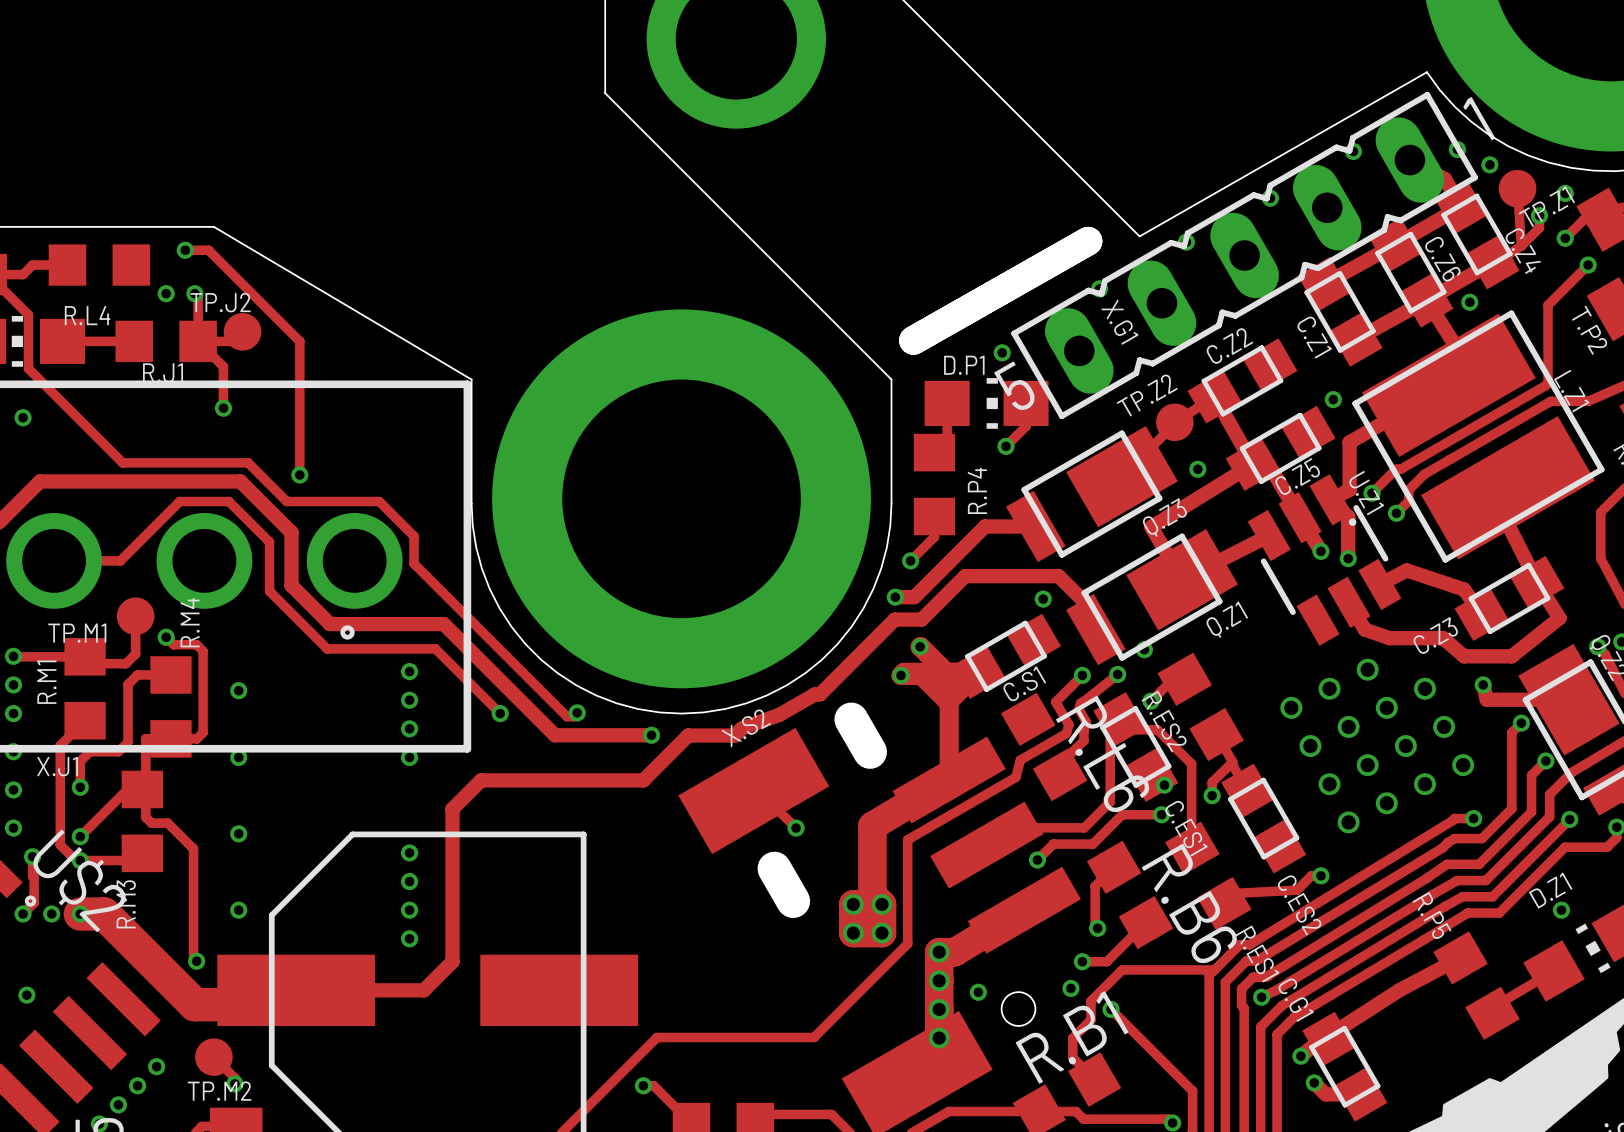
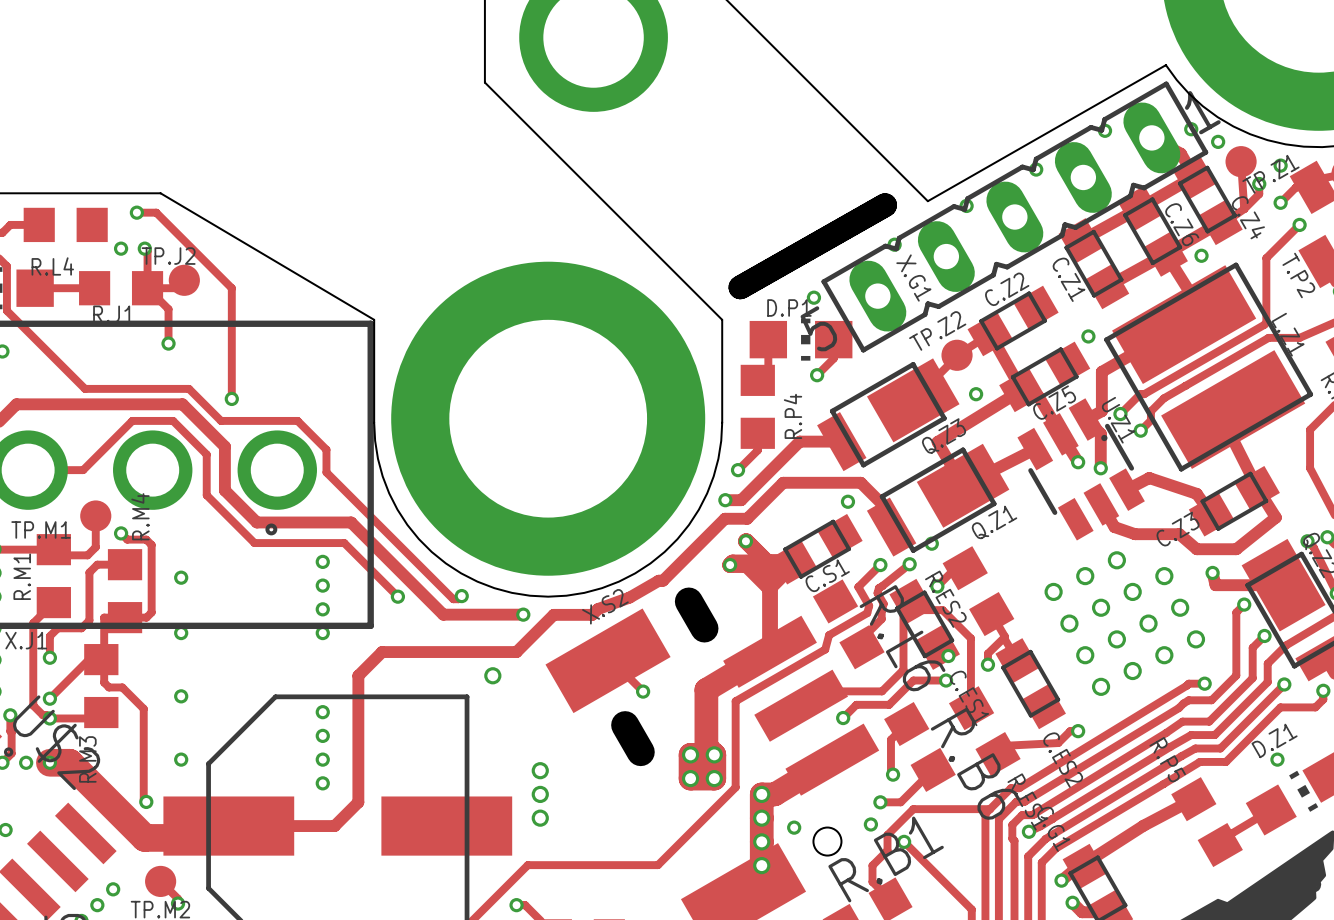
via: none -> (492, 675)
via: none -> (540, 770)
via: none -> (540, 794)
via: none -> (540, 818)

